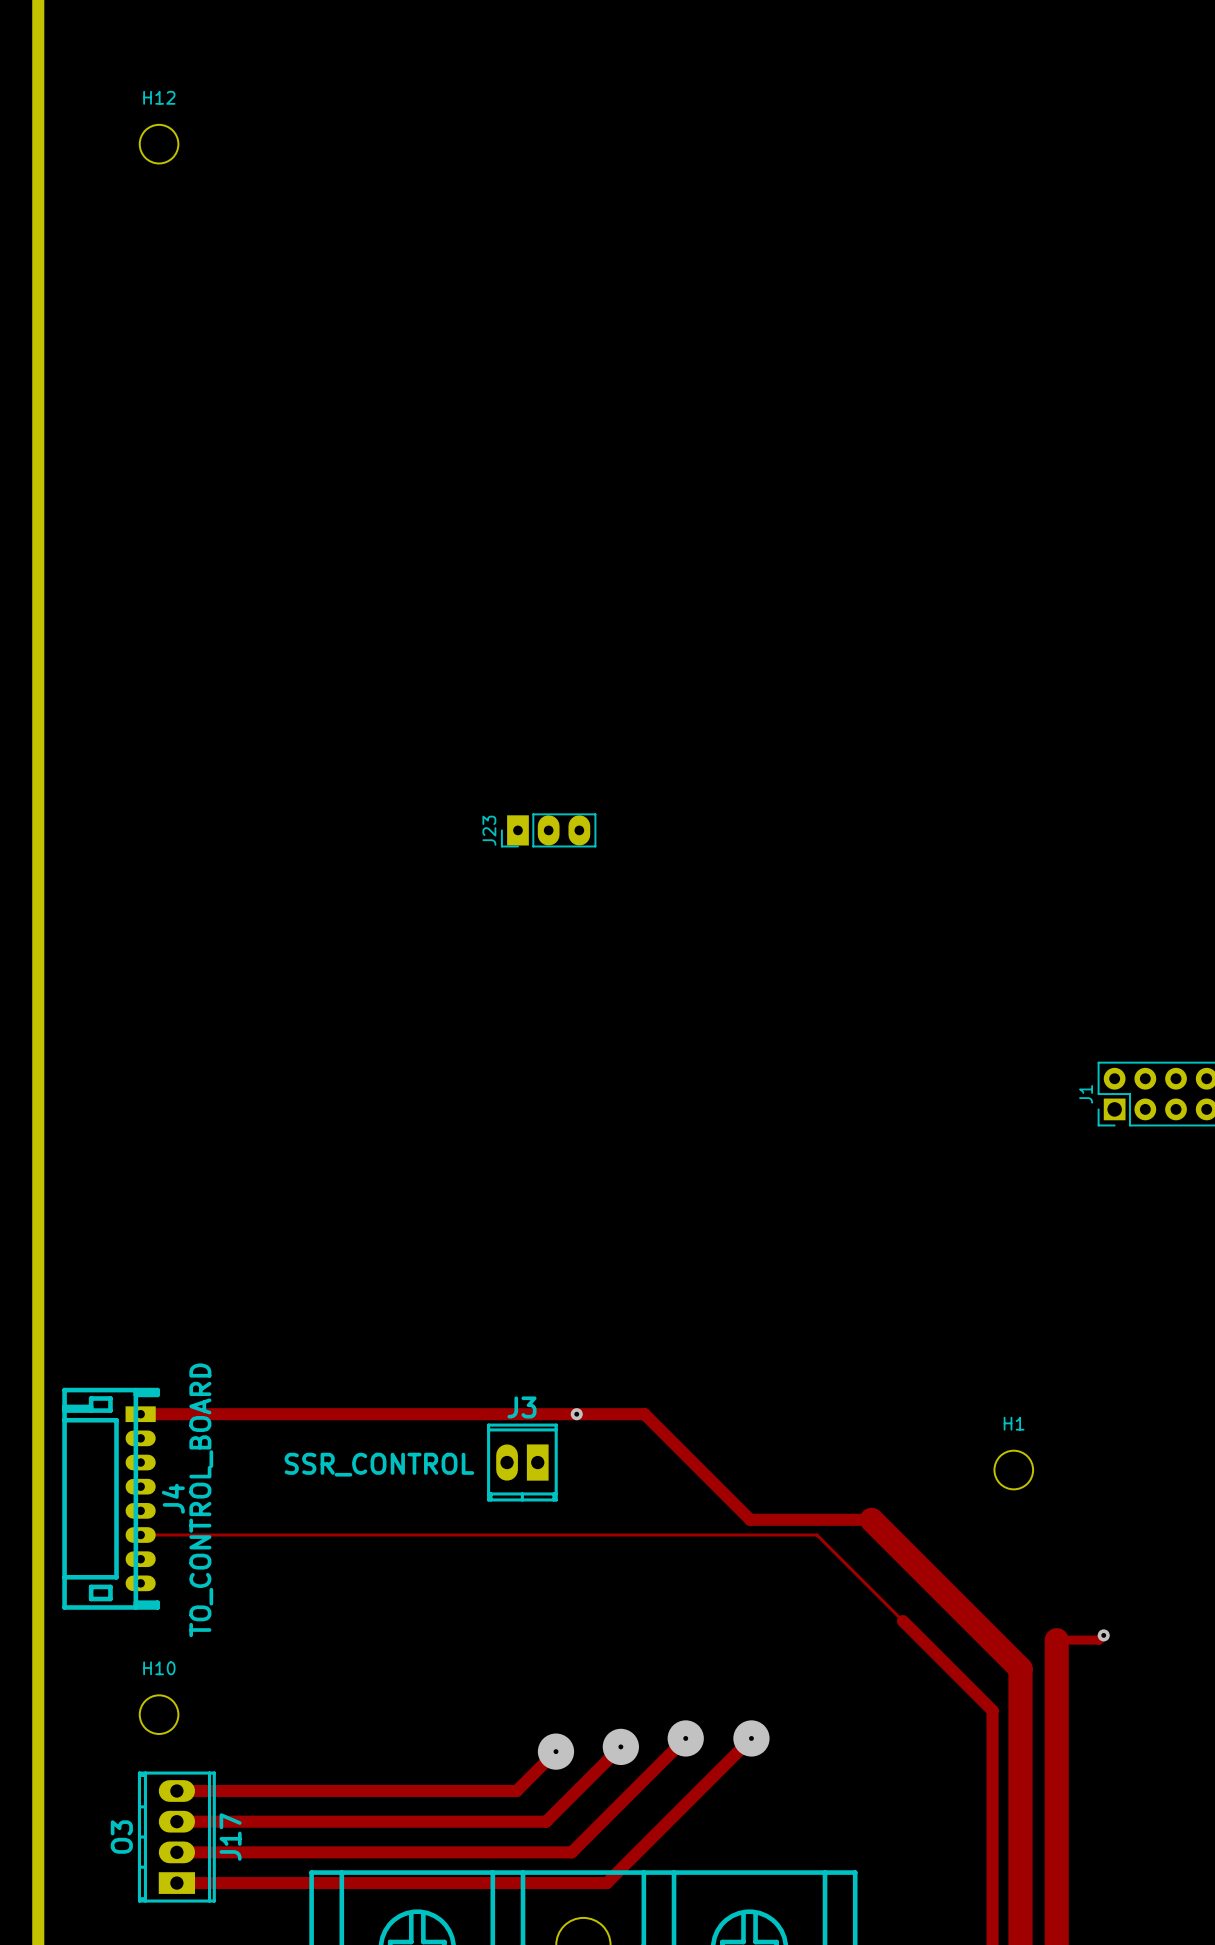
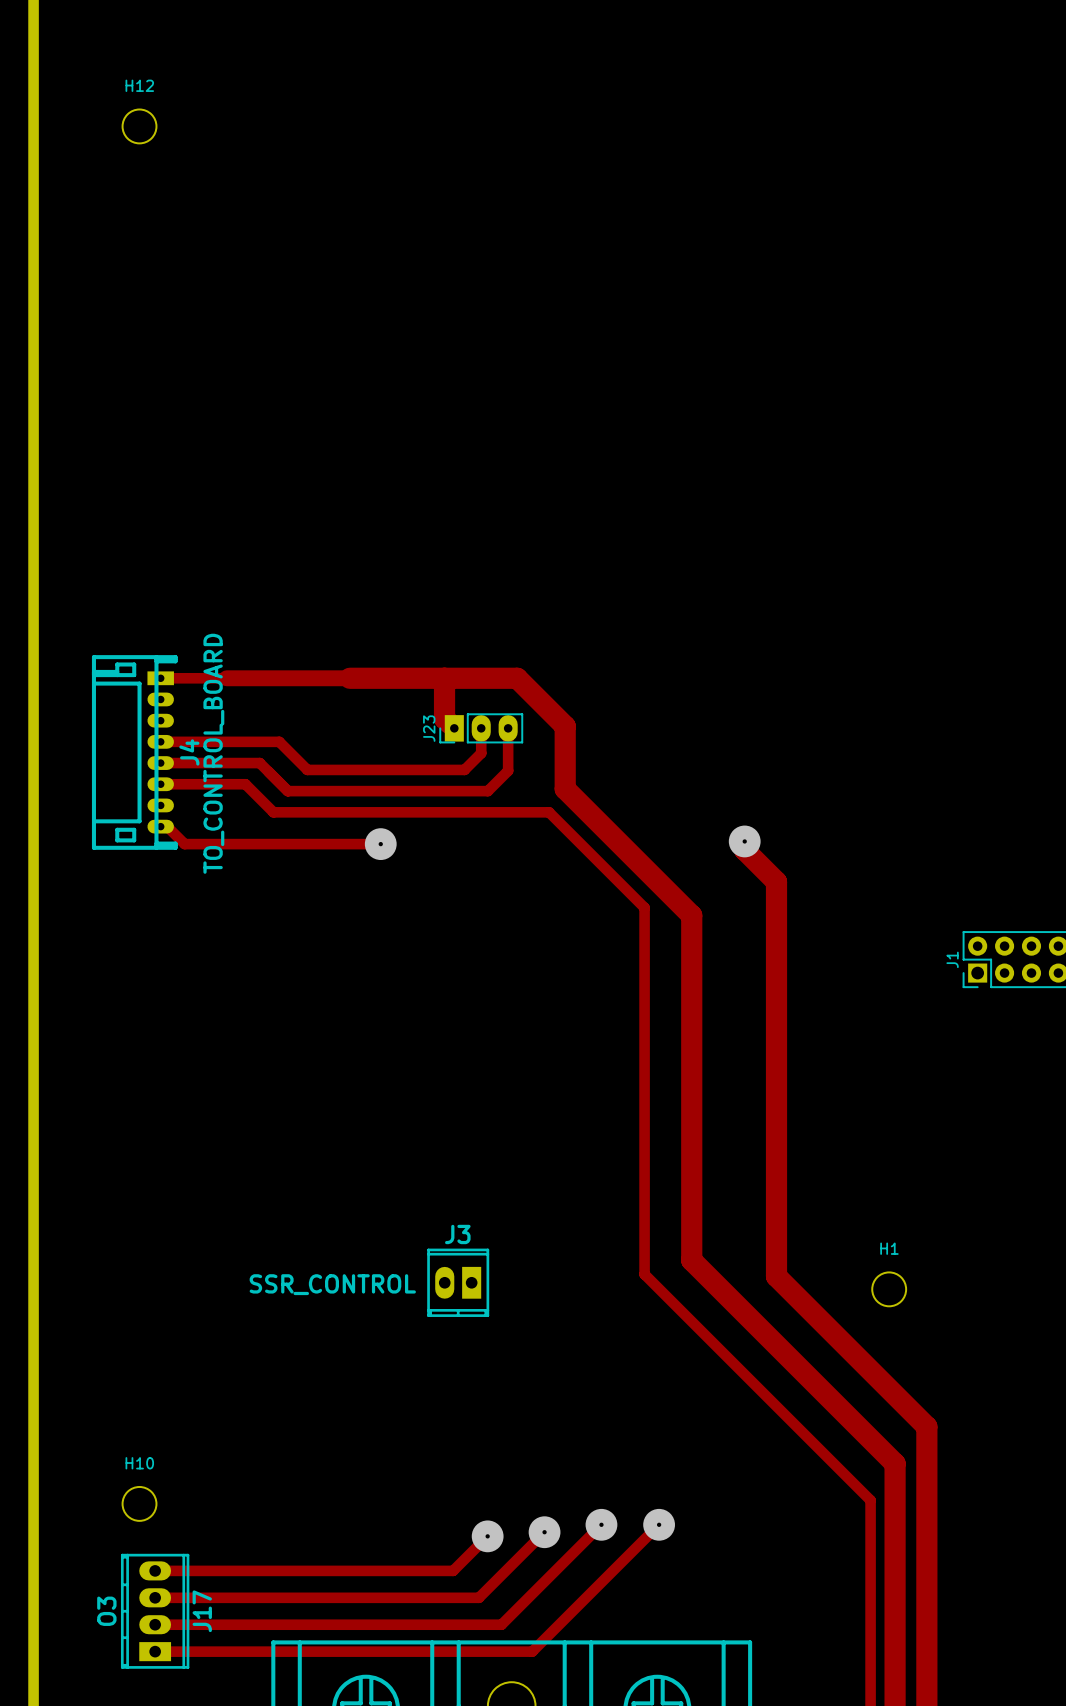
track: none -> (160, 678) (517, 678)
track: none -> (444, 678) (444, 718) (449, 723)
track: none -> (481, 728) (481, 753) (464, 769) (307, 769) (279, 741) (160, 741)
track: none -> (508, 728) (508, 770) (487, 791) (287, 791) (259, 763) (160, 763)
track: none -> (167, 826) (184, 844) (380, 844)
via: none -> (744, 841)
via: none -> (380, 844)
track: (140, 1414) (644, 1414) (750, 1519) (871, 1519) -> (517, 678) (565, 726) (565, 789) (691, 915) (691, 1260) (764, 1333)
via: (576, 1414) -> none
J4 position: (111, 1498) -> (134, 752)
track: (140, 1535) (816, 1535) -> (160, 784) (245, 784) (273, 812) (549, 812) (644, 907) (644, 1274) (716, 1346)
track width: thin (816, 1535) (902, 1621) -> thick (716, 1346) (791, 1421)
track: (1103, 1635) (1099, 1640) (1056, 1640) -> (744, 841) (744, 850) (776, 881) (776, 1276) (926, 1426) (926, 1438)
via: (1103, 1635) -> none

